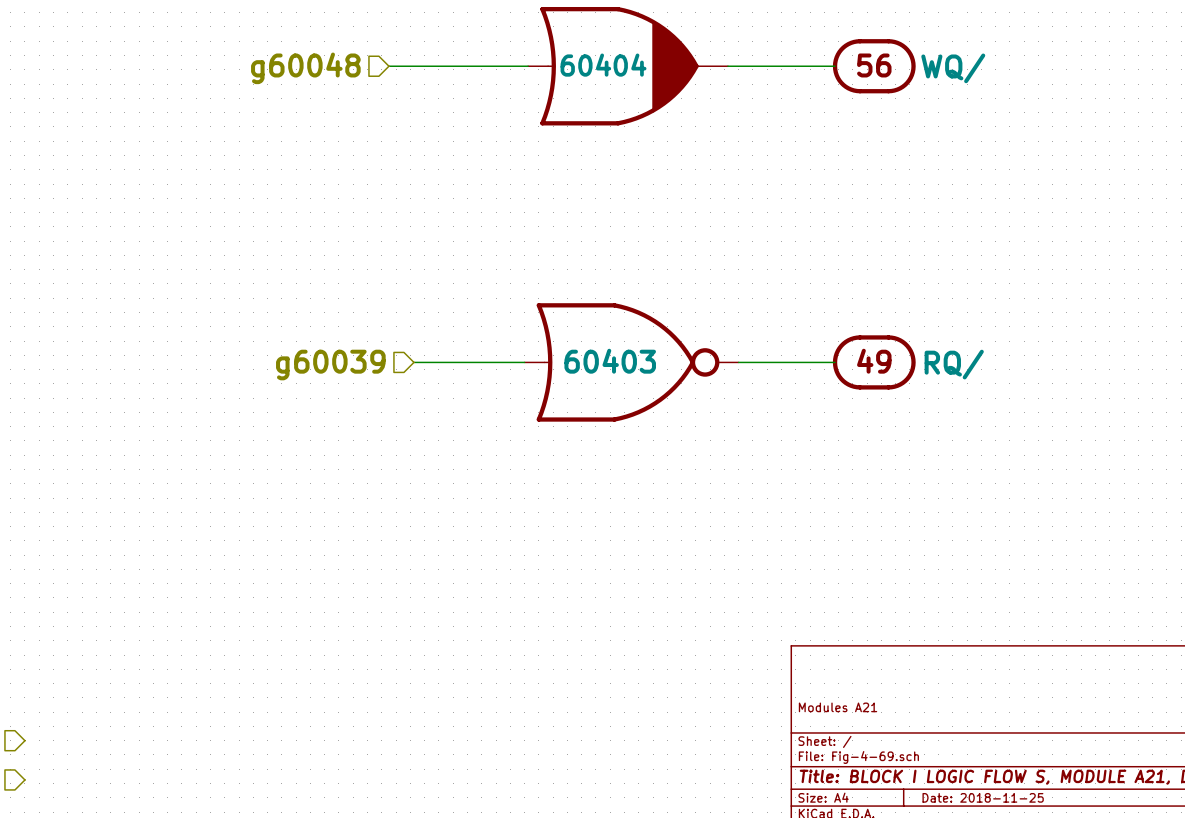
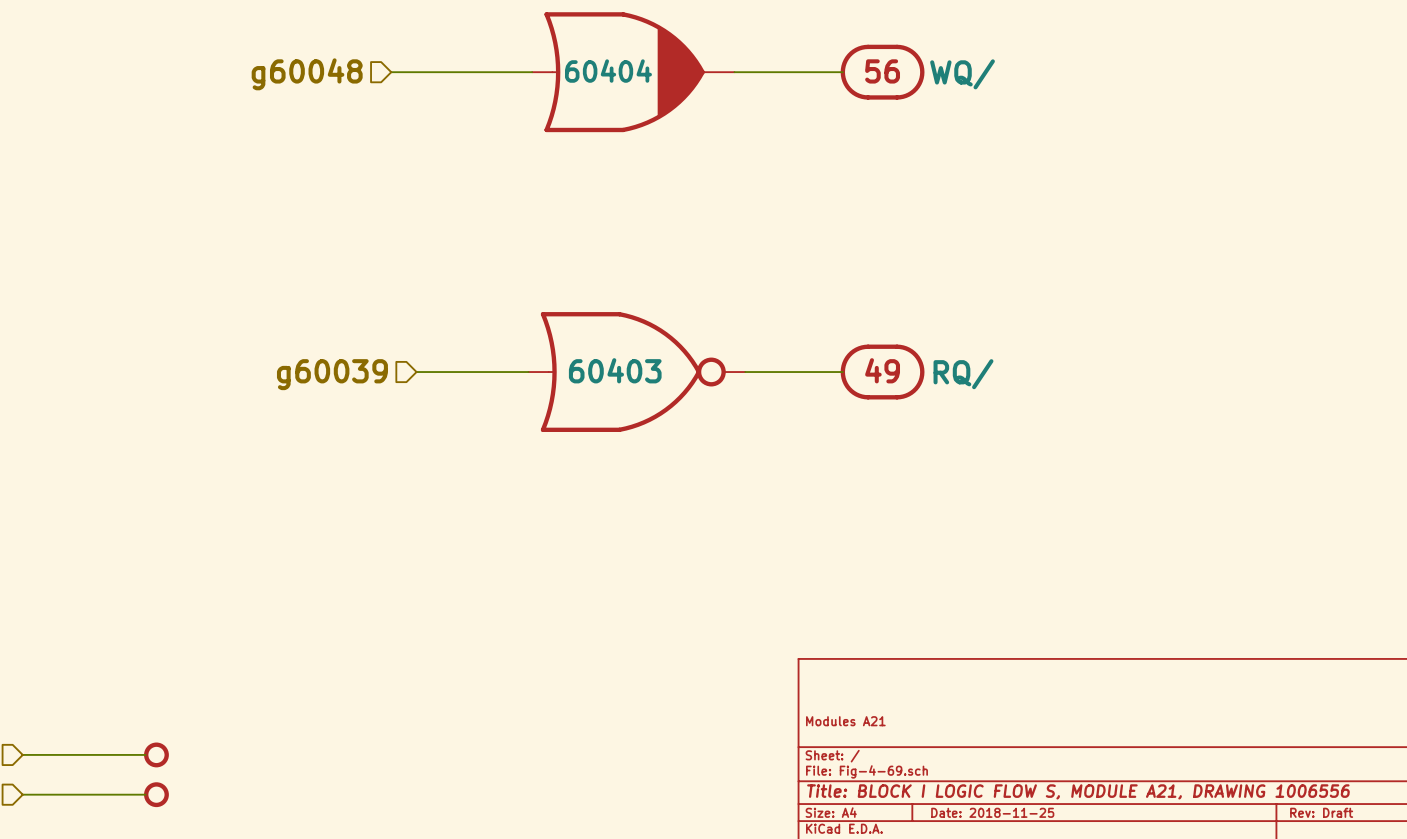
wire: none -> (22, 754) (145, 754)
part: none -> (156, 754)
wire: none -> (22, 794) (145, 794)
part: none -> (156, 794)

